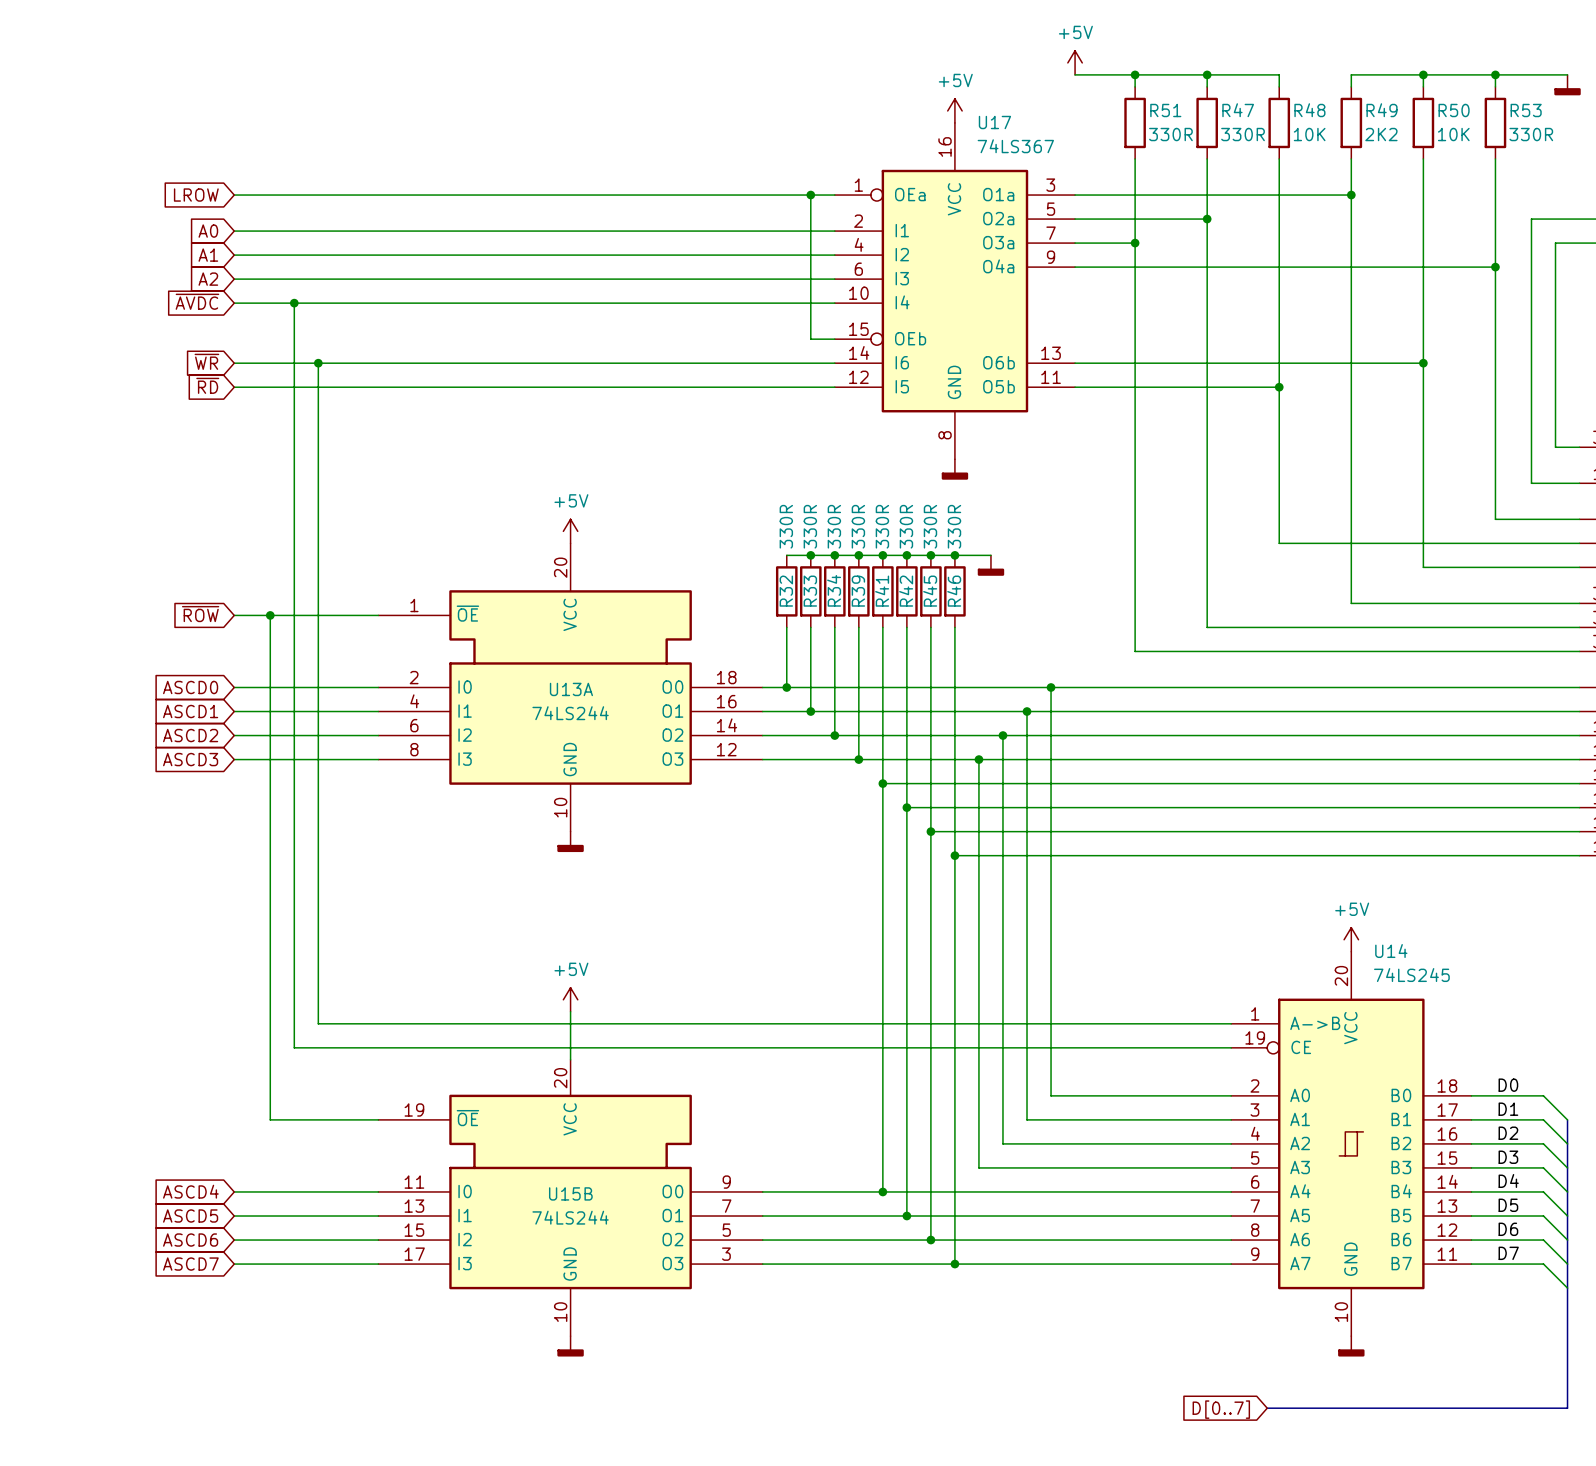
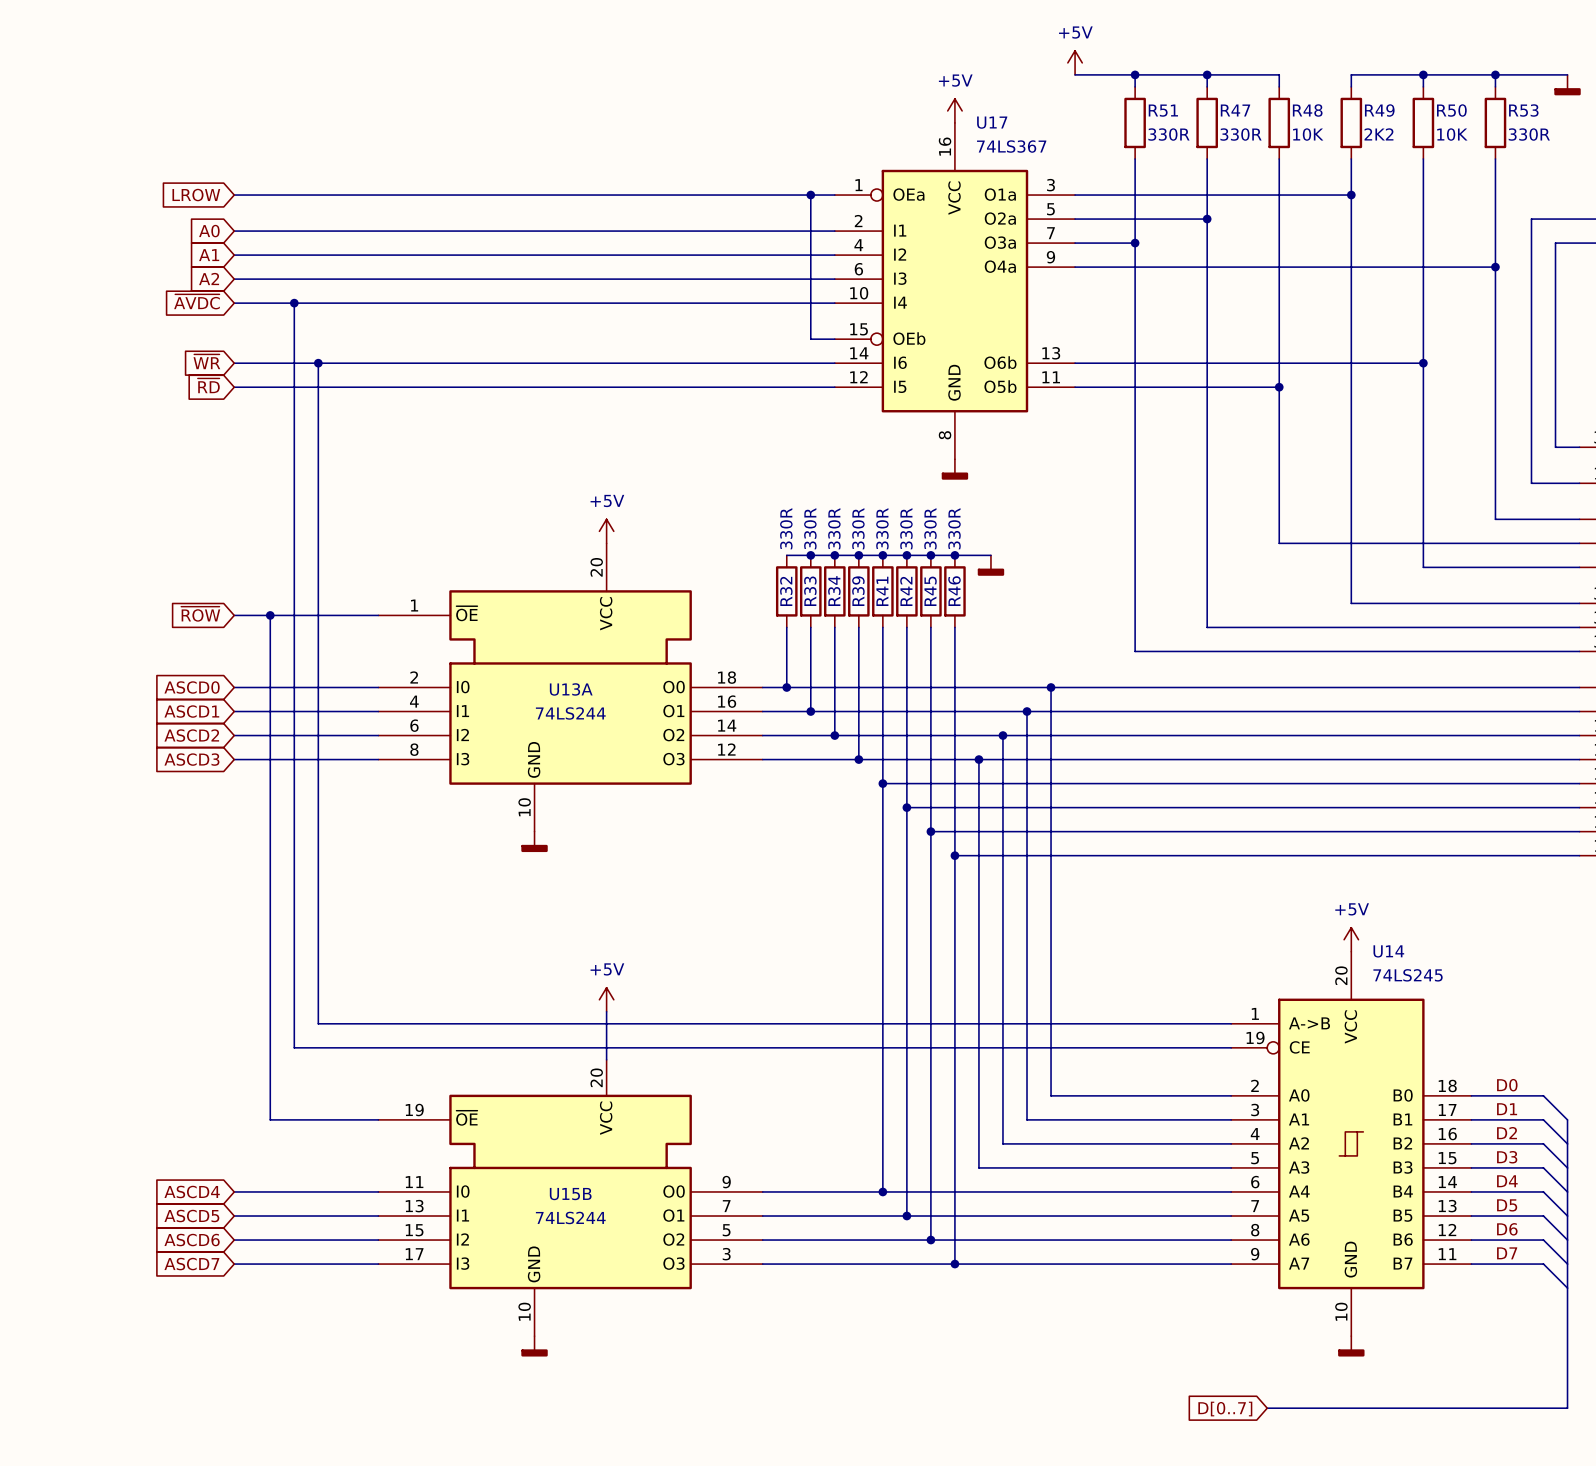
power symbol position: +5V (570, 531) -> +5V (606, 531)
U13A symbol: [378, 543, 763, 832] -> [378, 543, 763, 832]
power symbol position: (570, 841) -> (534, 841)
power symbol position: +5V (570, 999) -> +5V (606, 999)
wire: (570, 1011) (570, 1059) -> (606, 1011) (606, 1059)
U15B symbol: [378, 1059, 763, 1337] -> [378, 1059, 763, 1337]
power symbol position: (570, 1346) -> (534, 1346)

